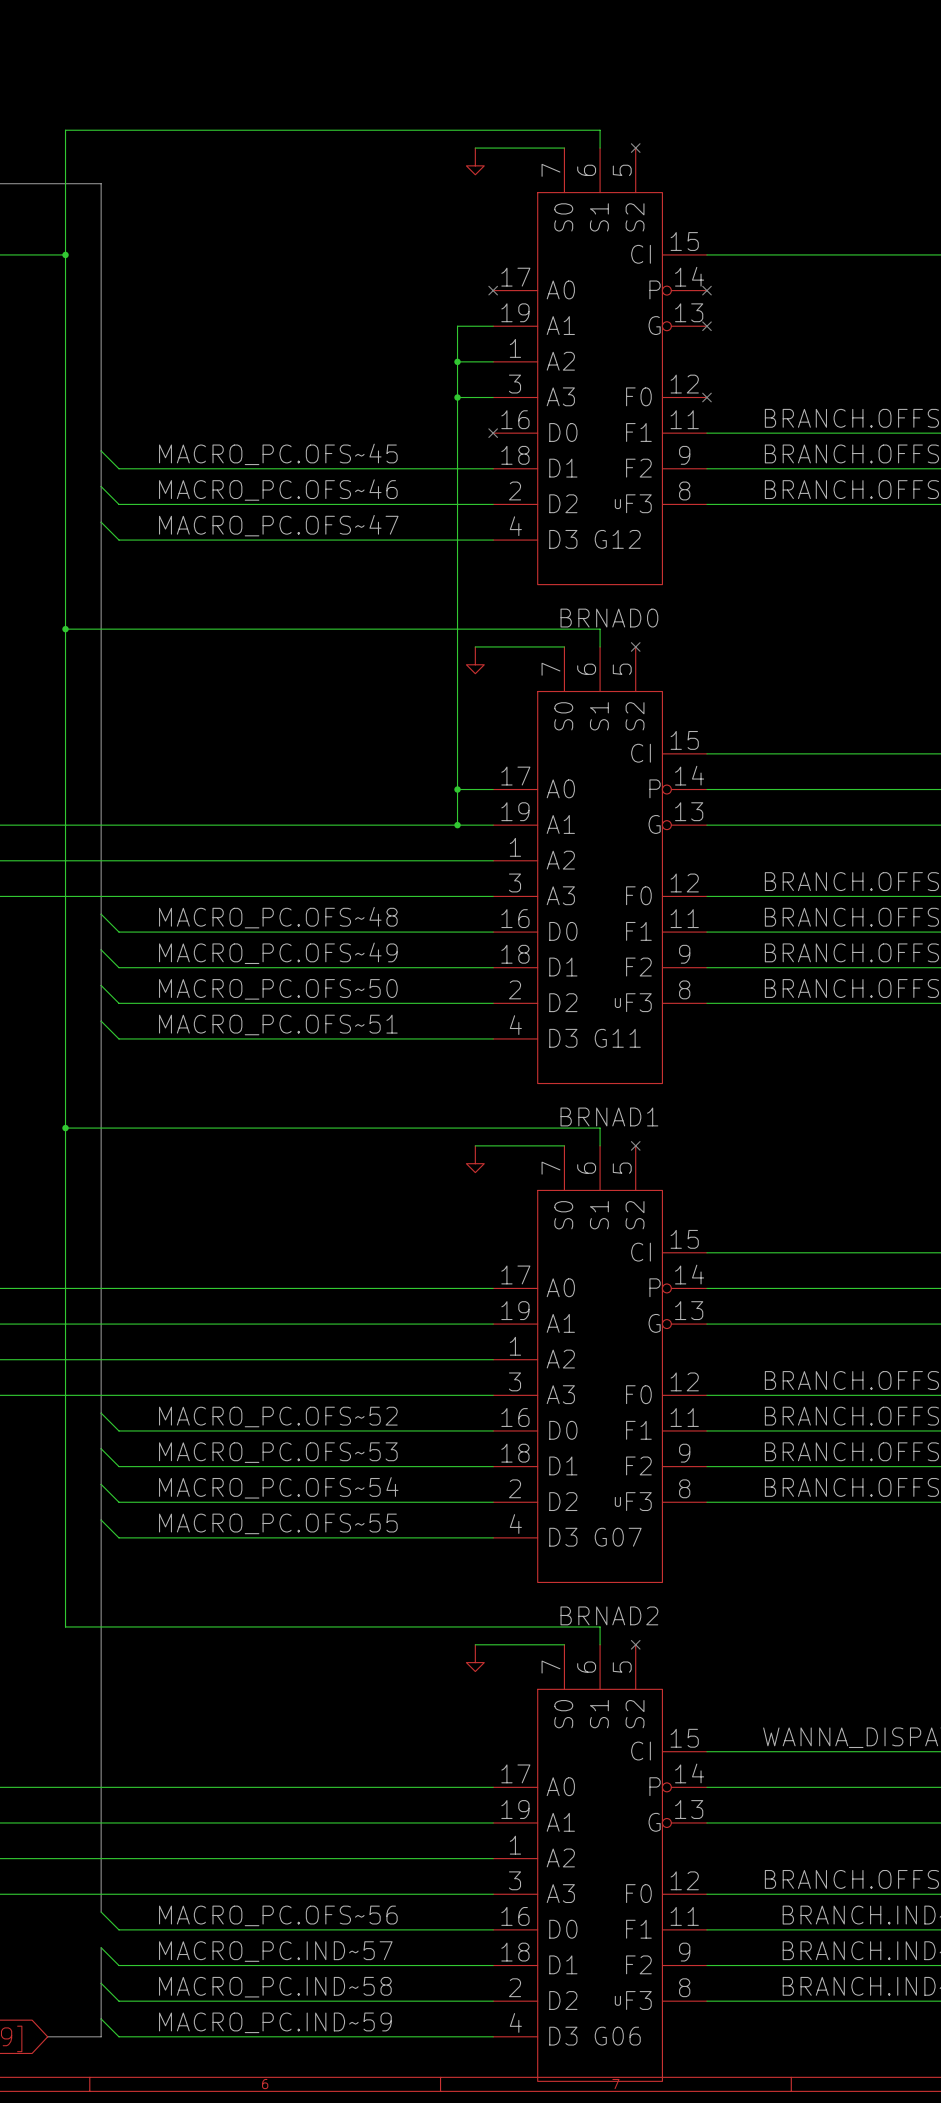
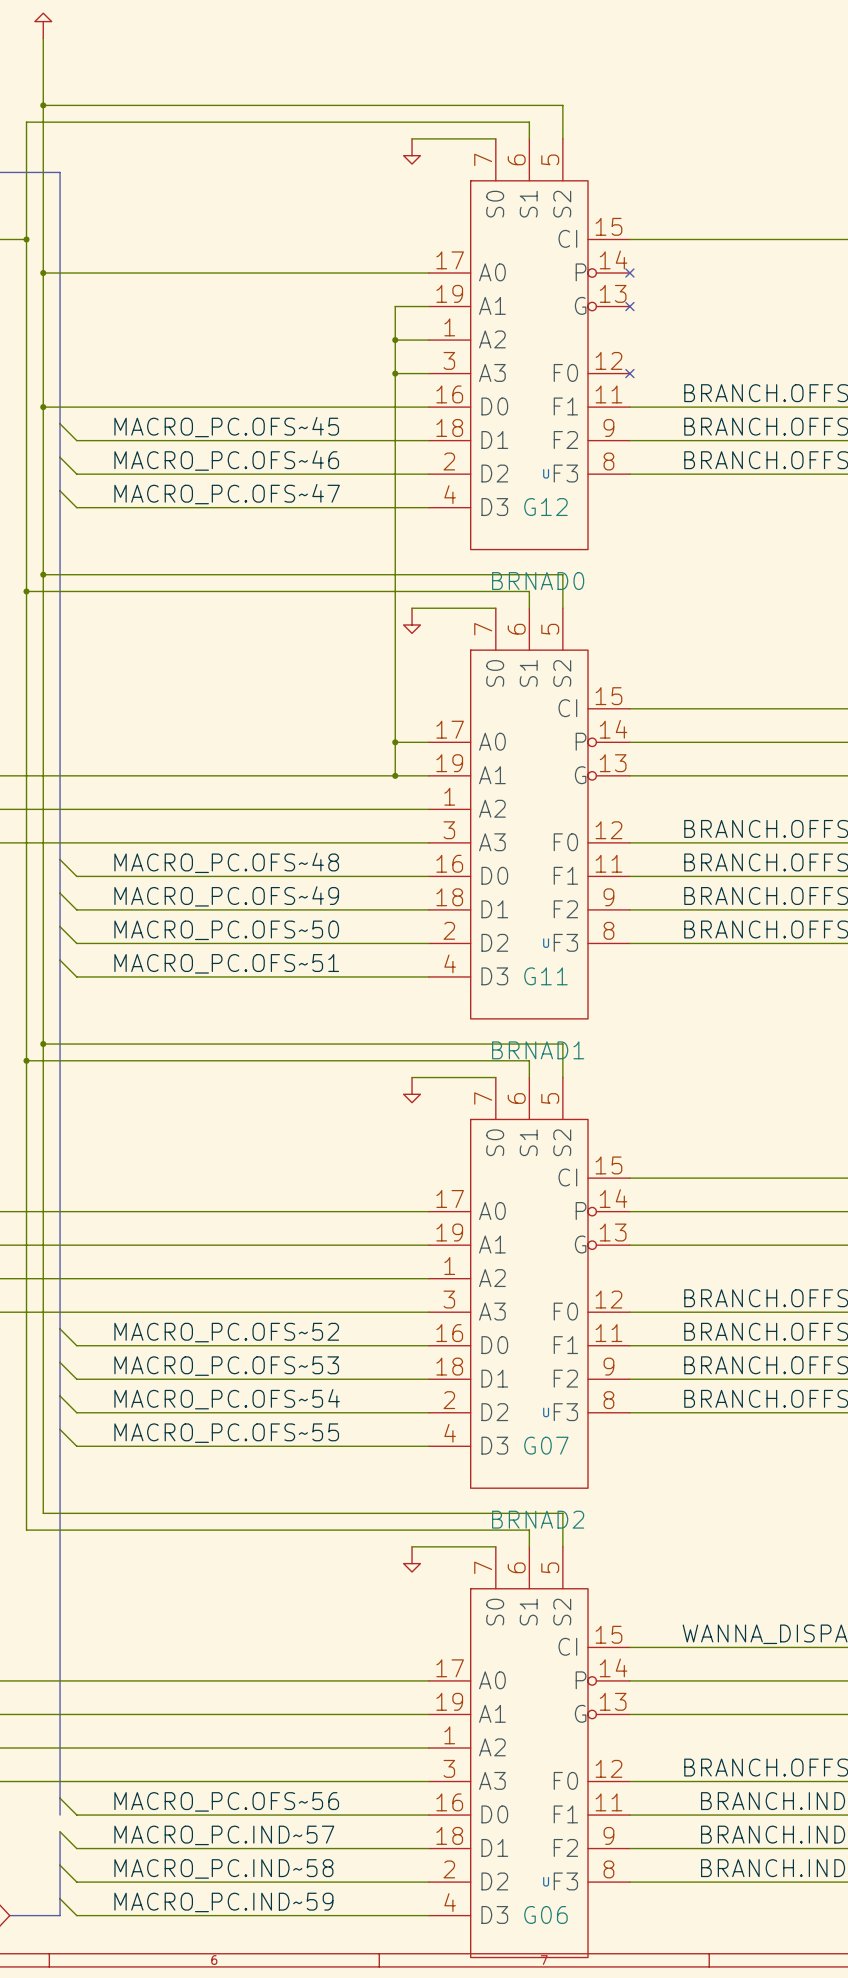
power symbol: none -> (43, 25)
wire: none -> (43, 38) (43, 1513) (562, 1513) (562, 1546)
wire: none -> (43, 105) (562, 105) (562, 138)
junction: none -> (43, 105)
no-connect mark: (635, 148) -> none
wire: none -> (43, 273) (428, 273)
junction: none -> (43, 273)
no-connect mark: (493, 290) -> none
wire: none -> (43, 407) (428, 407)
junction: none -> (43, 407)
no-connect mark: (493, 433) -> none
wire: none -> (43, 574) (562, 574) (562, 608)
junction: none -> (43, 574)
no-connect mark: (635, 646) -> none
wire: none -> (43, 1044) (562, 1044) (562, 1077)
junction: none -> (43, 1044)
no-connect mark: (635, 1145) -> none
no-connect mark: (635, 1644) -> none
bus: none -> (60, 1798) (60, 1815)

